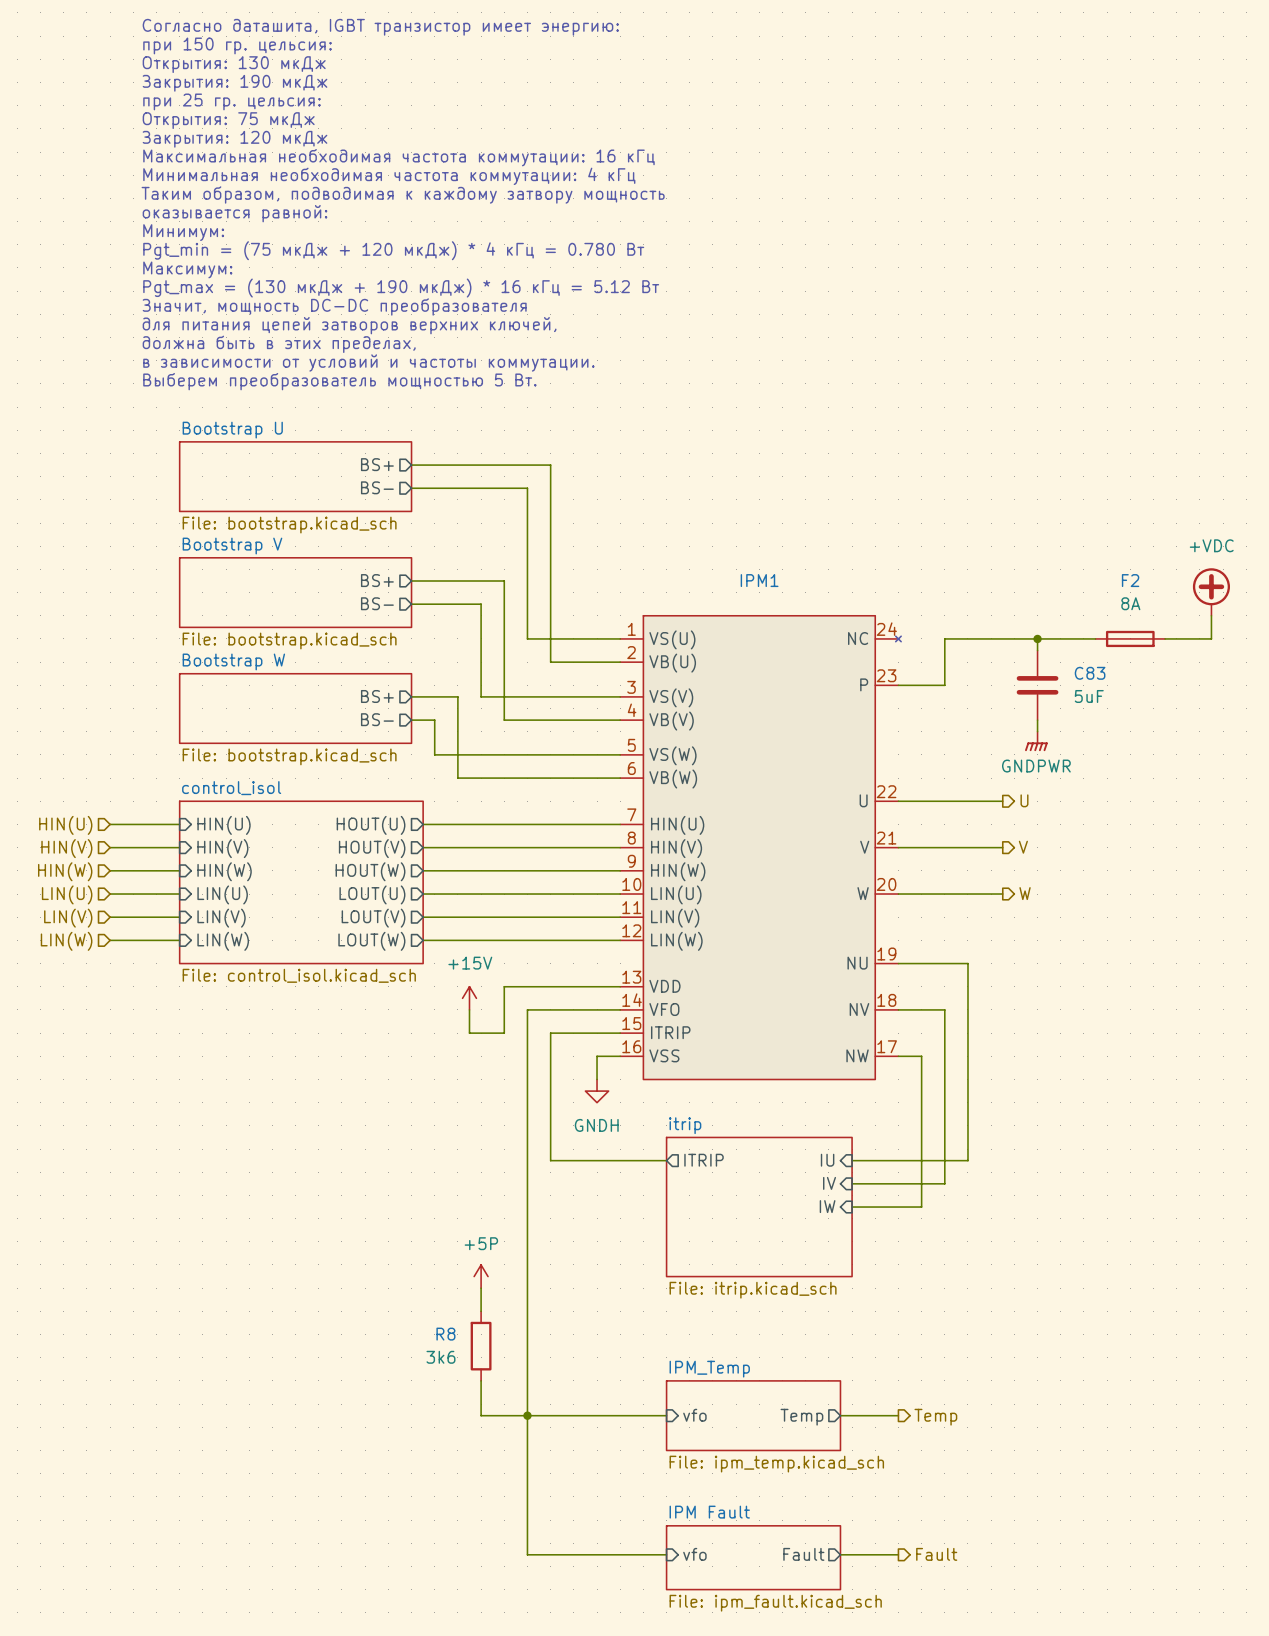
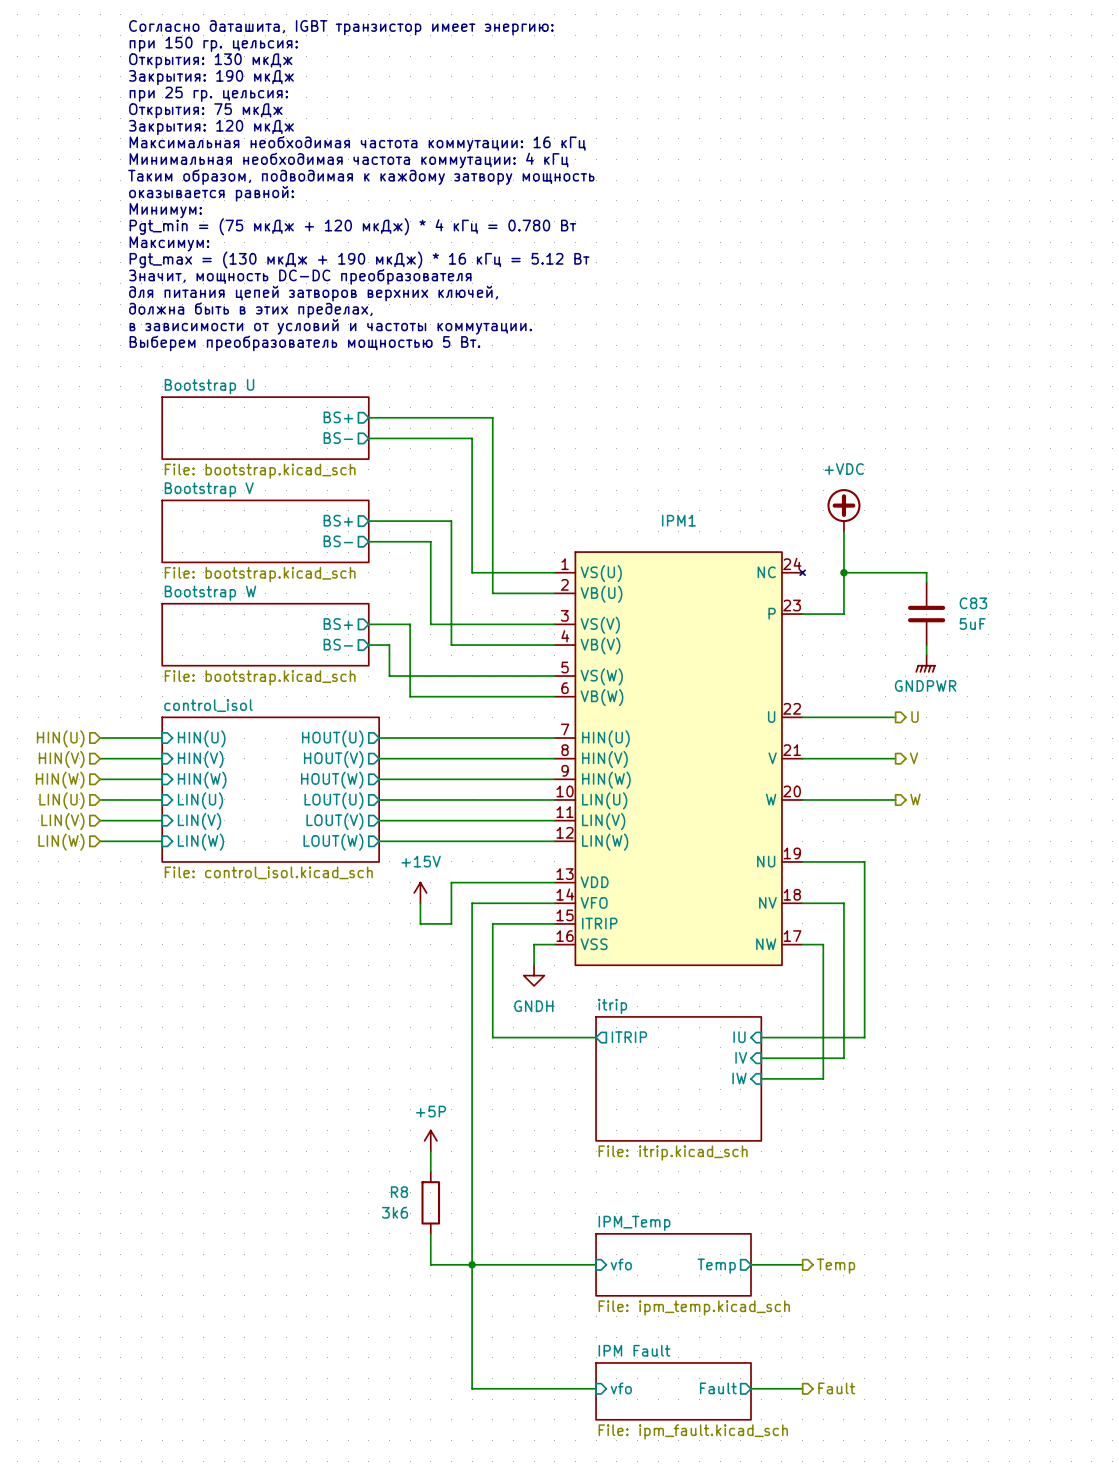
power symbol: none -> +VDC (843, 510)
wire: none -> (843, 531) (843, 572)
power symbol: +VDC (1211, 592) -> none
wire: (1211, 615) (1211, 638) (1165, 638) -> none
junction: none -> (843, 572)
wire: (1037, 638) (1095, 638) -> none
junction: (1037, 638) -> none
F2: 8A (1130, 638) -> none

